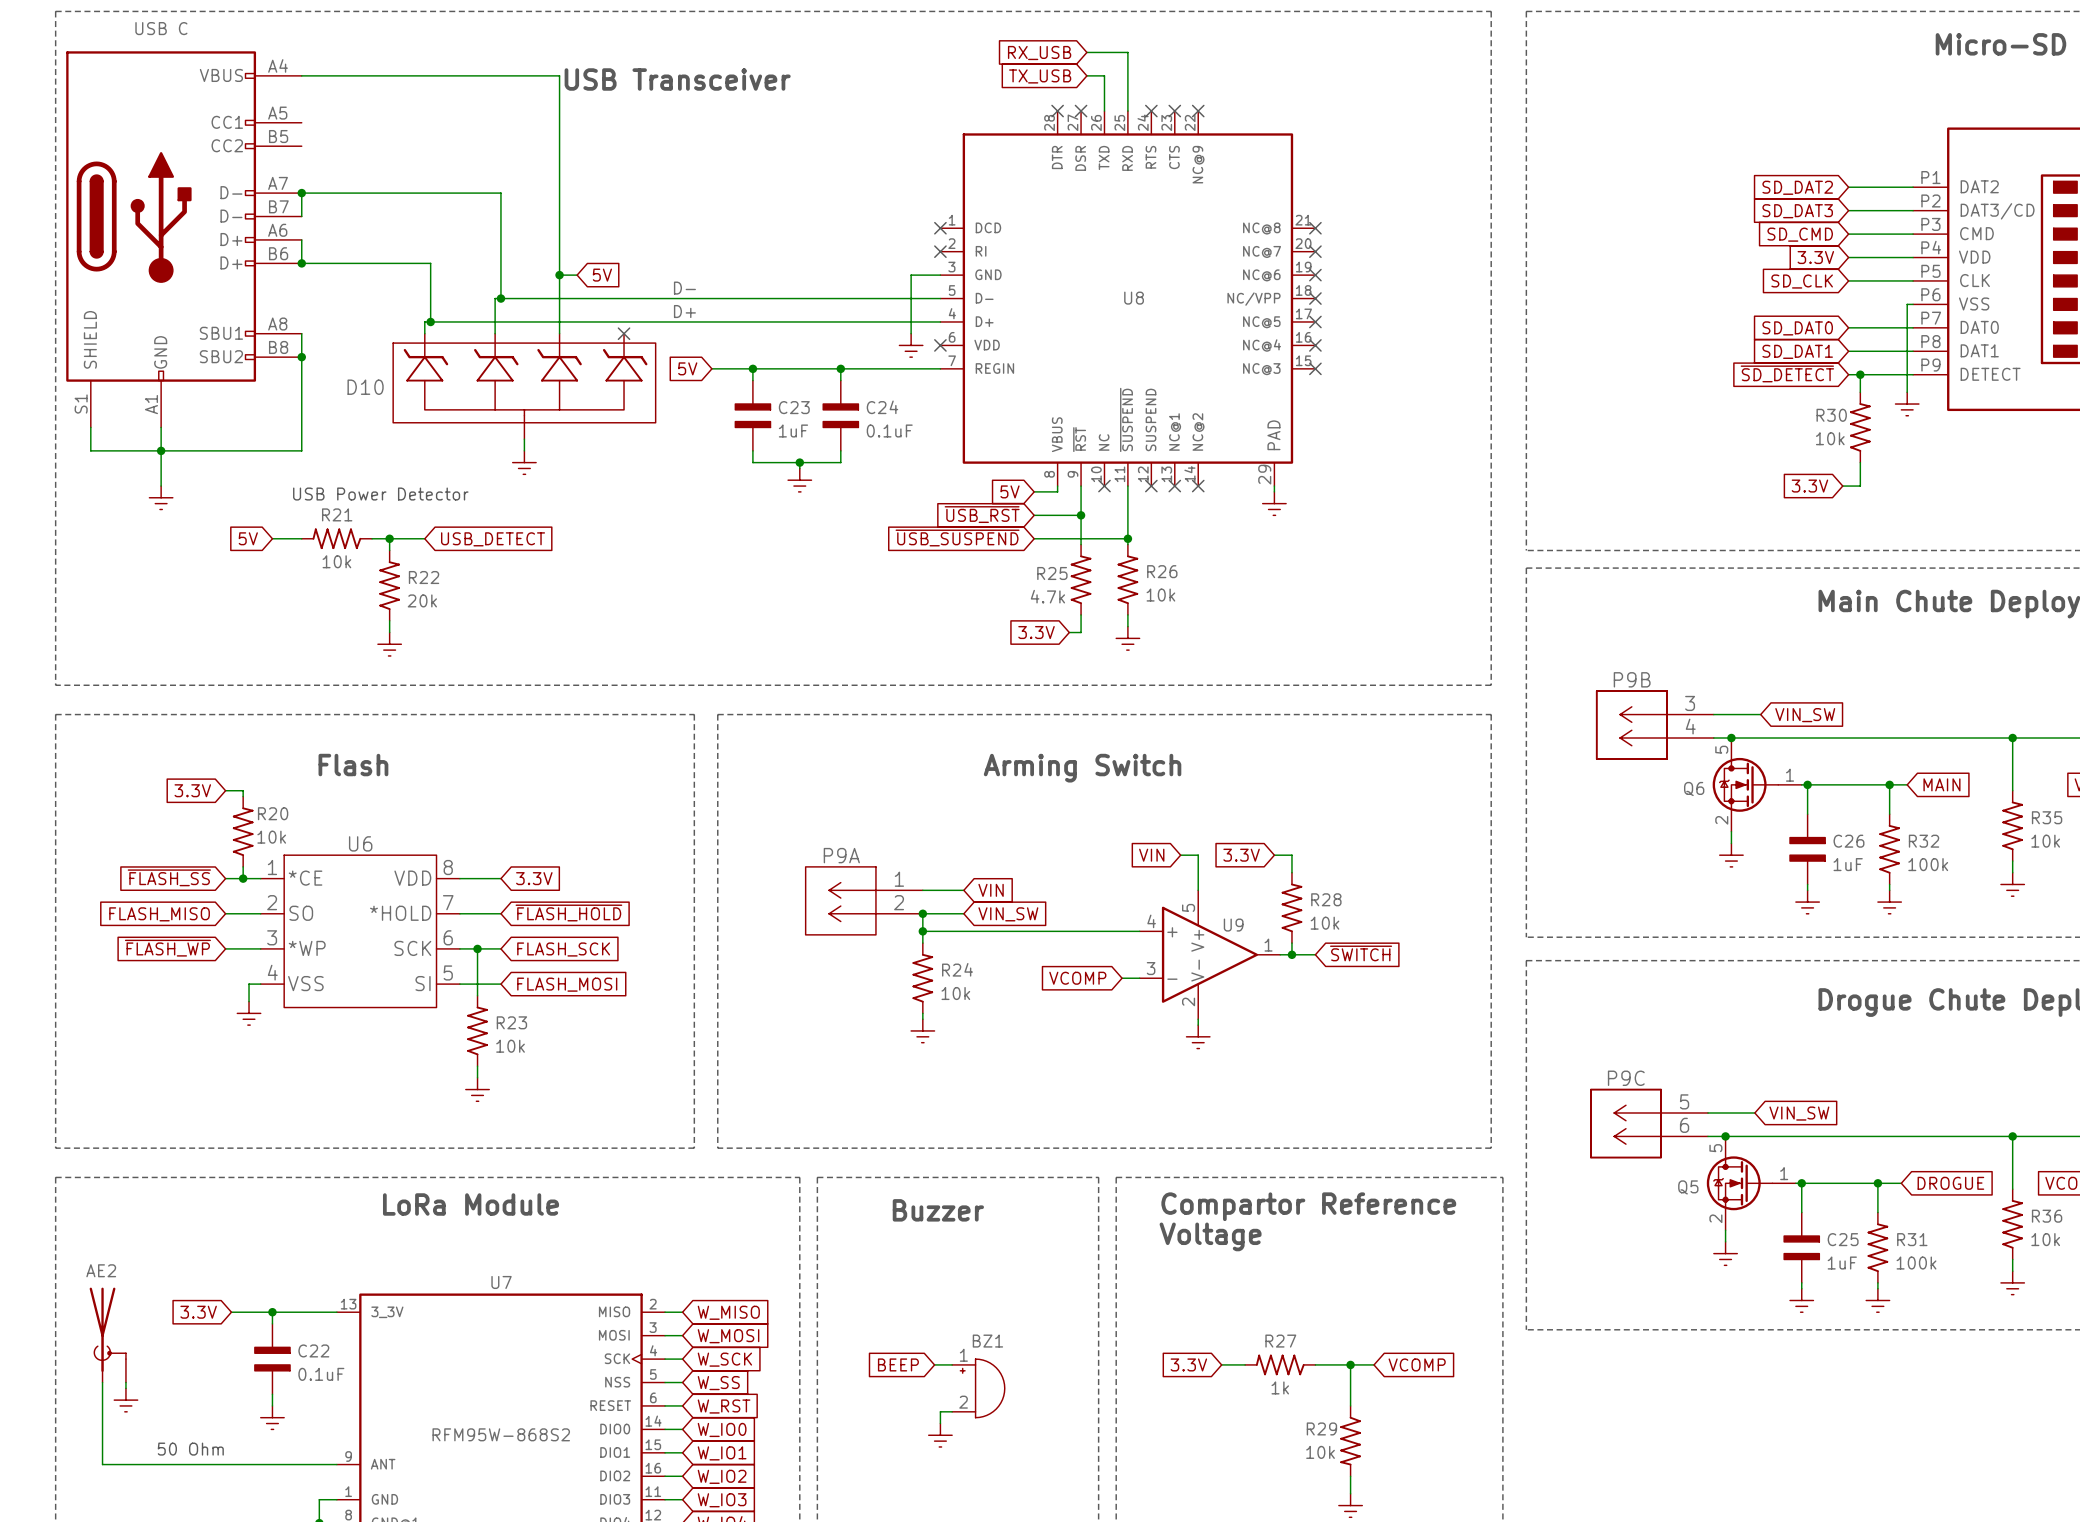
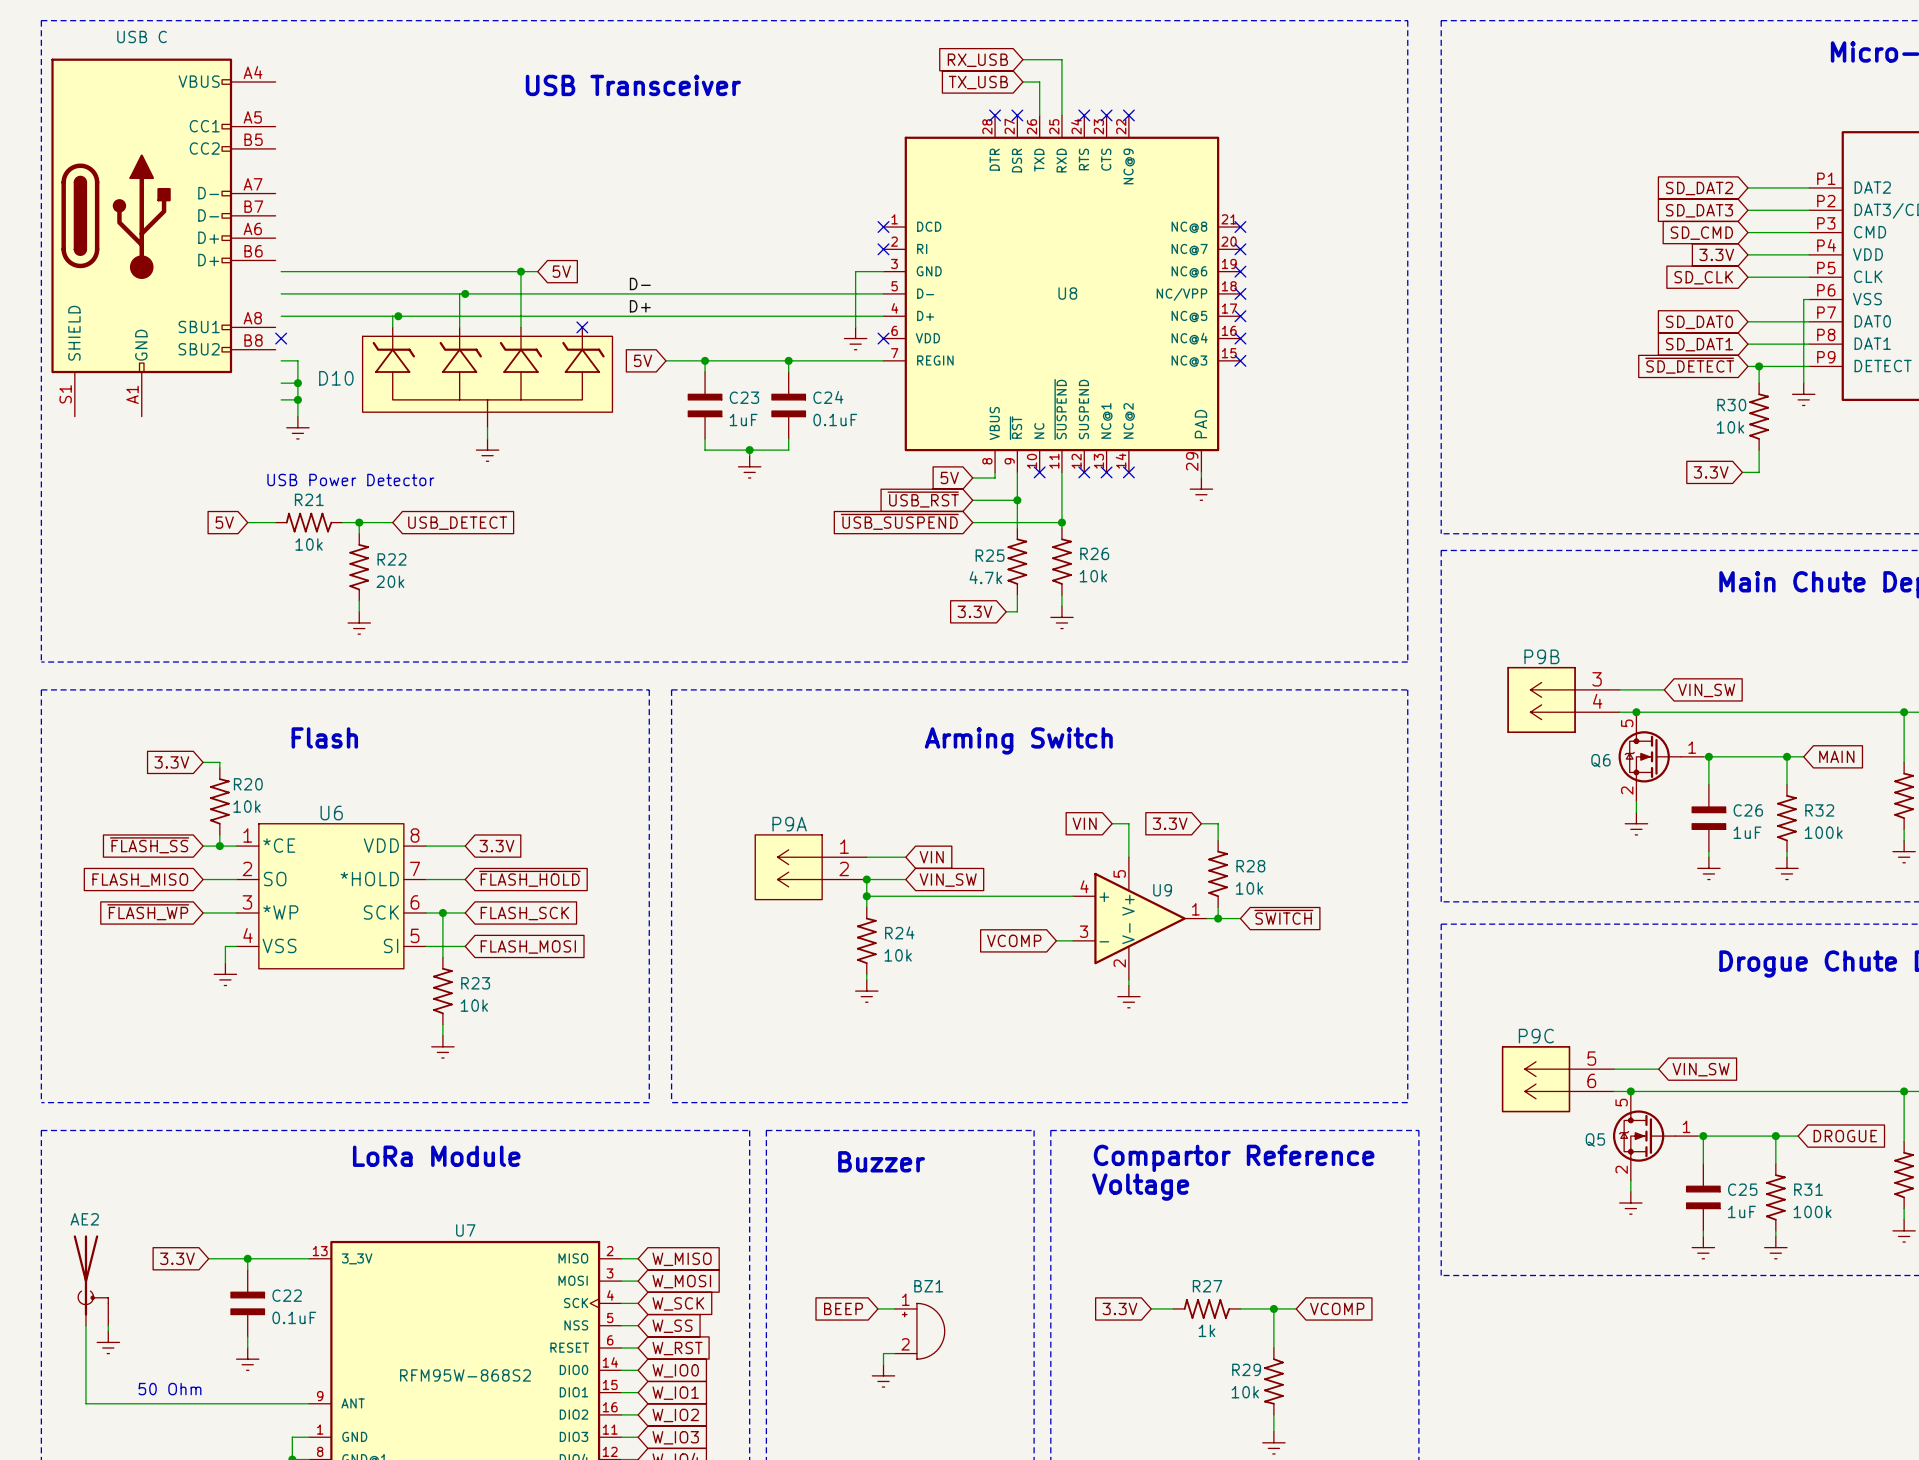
wire: (301, 75) (559, 75) (559, 275) -> (281, 271) (520, 271)
junction: (301, 193) -> none
wire: (301, 216) (301, 193) (500, 193) (500, 298) -> none
wire: (301, 239) (301, 263) (430, 263) (430, 321) -> none
junction: (301, 263) -> none
wire: none -> (281, 293) (459, 293)
wire: none -> (281, 316) (392, 316)
wire: (301, 333) (301, 450) (90, 450) (90, 427) -> none
no-connect mark: none -> (281, 338)
junction: (301, 357) -> none
wire: none -> (281, 360) (297, 360) (297, 416)
wire: none -> (281, 383) (297, 383)
junction: none -> (297, 383)
wire: none -> (281, 399) (297, 399)
junction: none -> (297, 399)
wire: (161, 427) (161, 486) -> none
junction: (161, 450) -> none
power symbol position: (161, 497) -> (297, 427)

